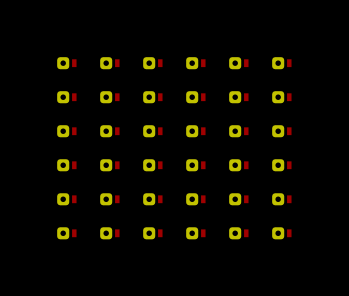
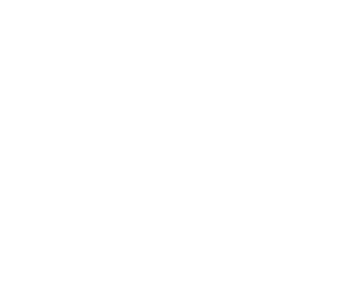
part: (66, 63) -> none
part: (109, 63) -> none
part: (152, 63) -> none
part: (195, 63) -> none
part: (238, 63) -> none
part: (281, 63) -> none
part: (66, 97) -> none
part: (109, 97) -> none
part: (152, 97) -> none
part: (195, 97) -> none
part: (238, 97) -> none
part: (281, 97) -> none
part: (66, 131) -> none
part: (109, 131) -> none
part: (152, 131) -> none
part: (195, 131) -> none
part: (238, 131) -> none
part: (281, 131) -> none
part: (66, 165) -> none
part: (109, 165) -> none
part: (152, 165) -> none
part: (195, 165) -> none
part: (238, 165) -> none
part: (281, 165) -> none
part: (66, 199) -> none
part: (109, 199) -> none
part: (152, 199) -> none
part: (195, 199) -> none
part: (238, 199) -> none
part: (281, 199) -> none
part: (66, 233) -> none
part: (109, 233) -> none
part: (152, 233) -> none
part: (195, 233) -> none
part: (238, 233) -> none
part: (281, 233) -> none

